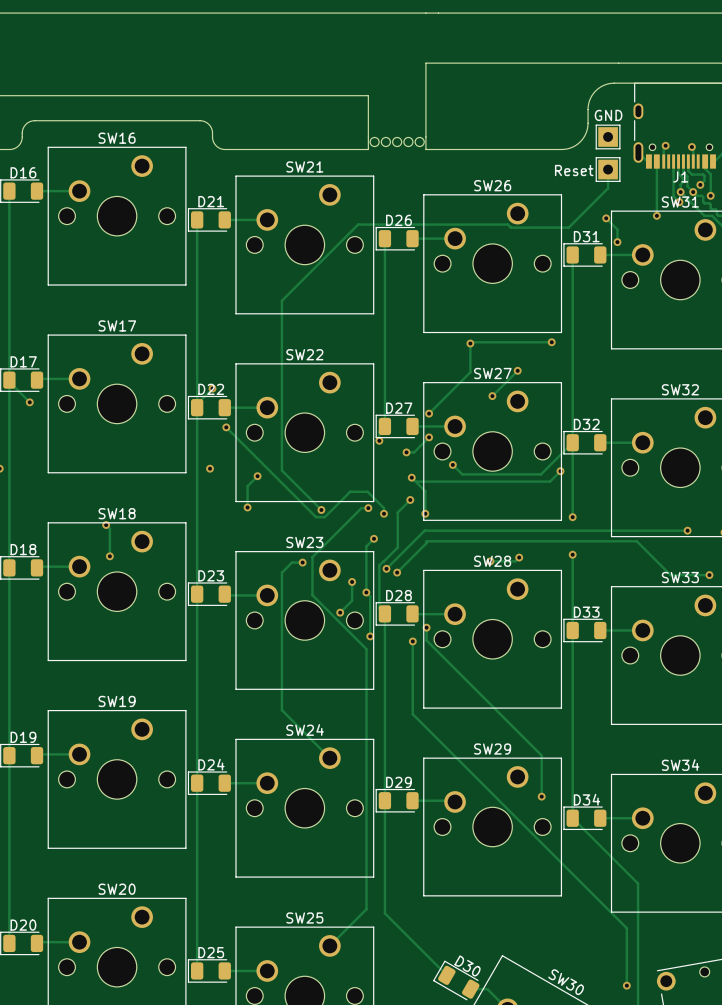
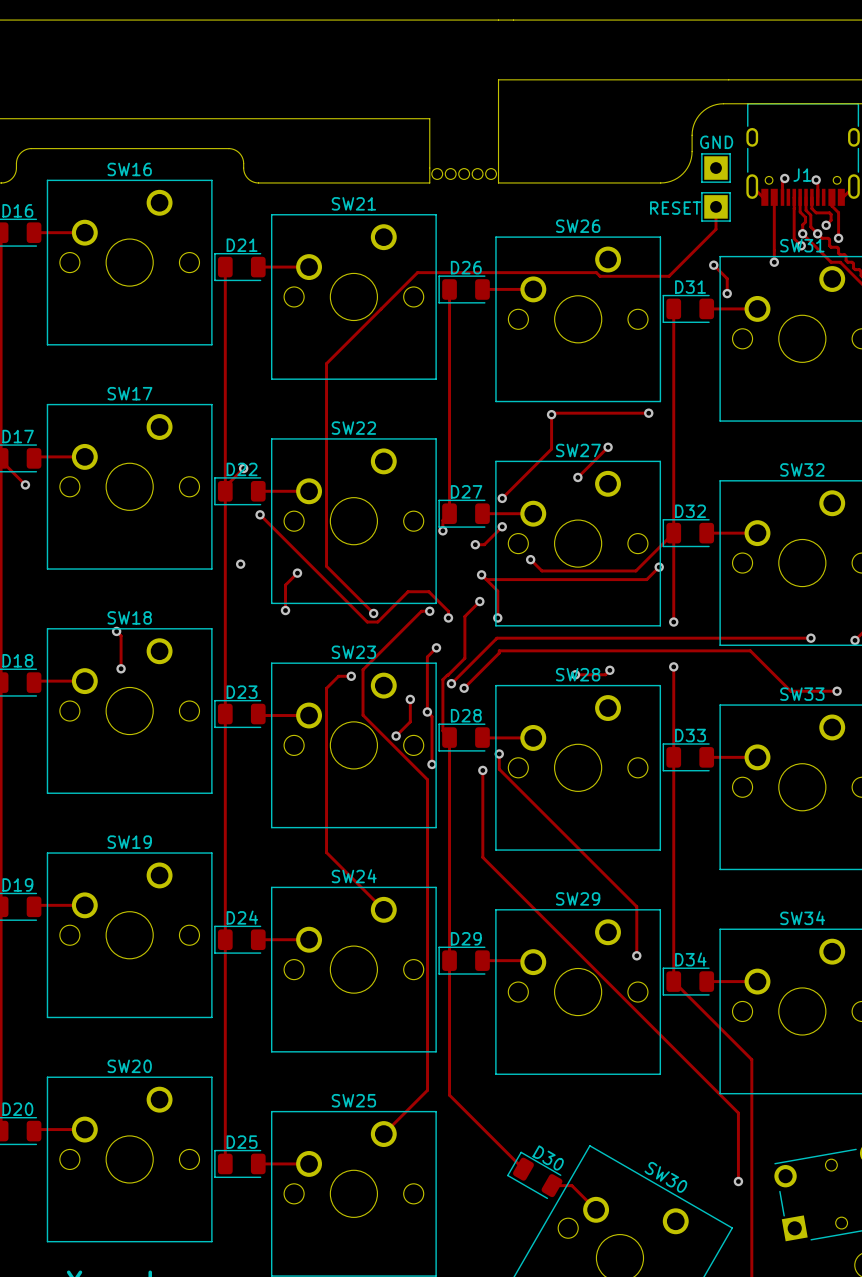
Reset name: Reset (574, 170) -> RESET (675, 208)
J1 name position: J1 (680, 176) -> J1 (802, 175)

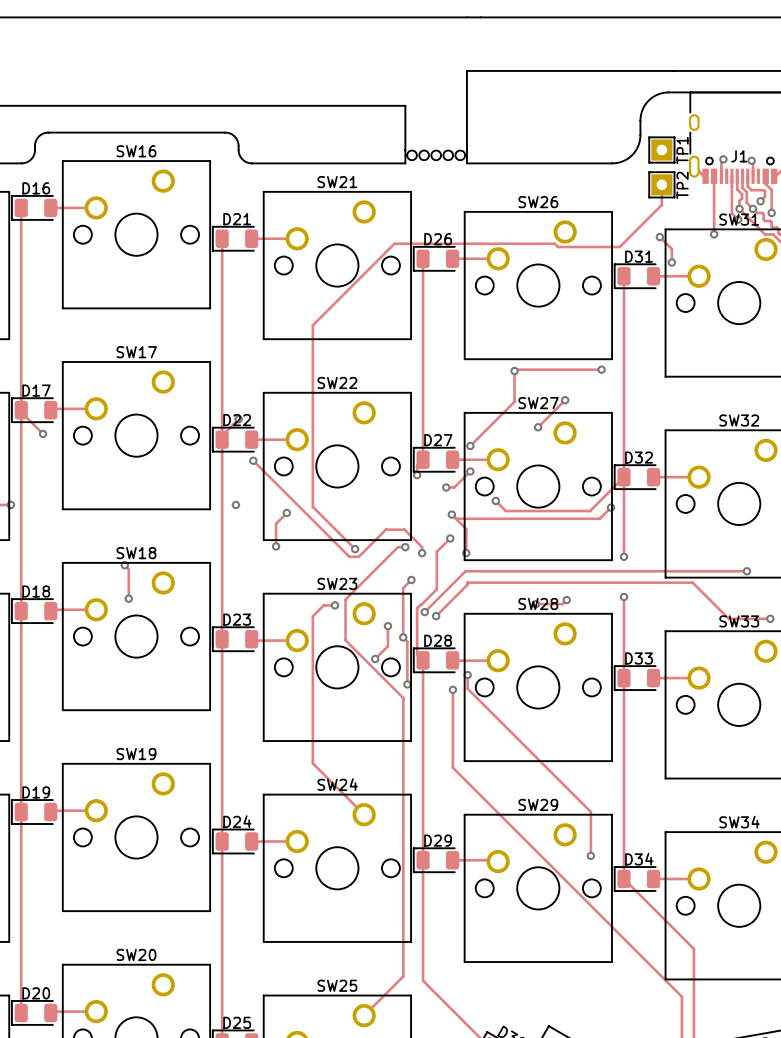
GND name: GND (716, 142) -> TP1 (682, 150)
RESET name: RESET (675, 208) -> TP2 (682, 185)

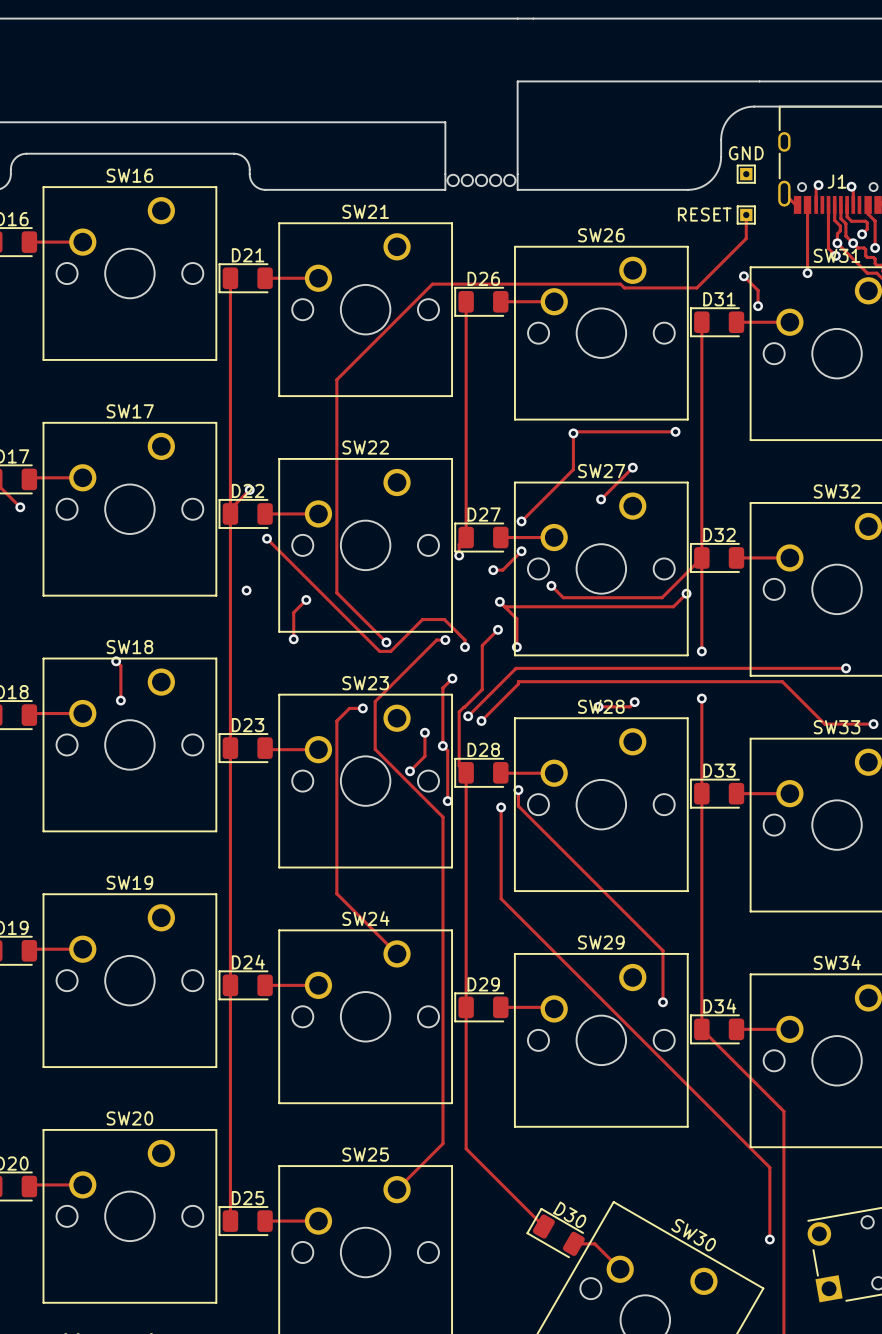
TP1: (661, 150) -> none
GND: none -> (746, 174)
TP2: (661, 184) -> none
RESET: none -> (746, 215)

